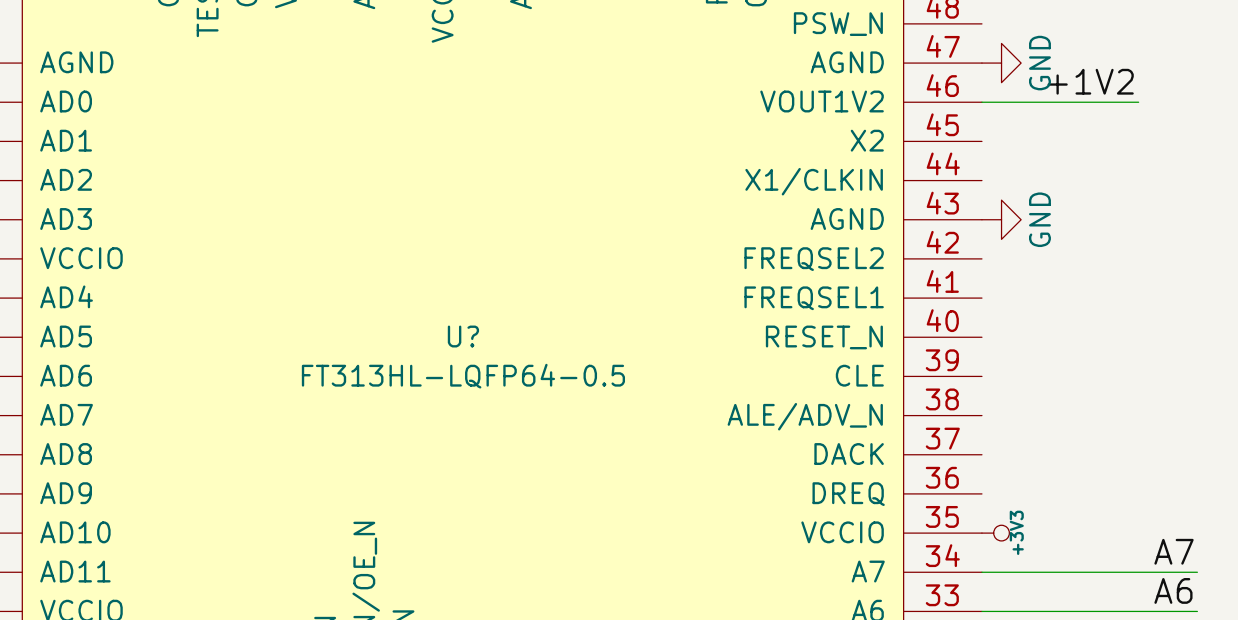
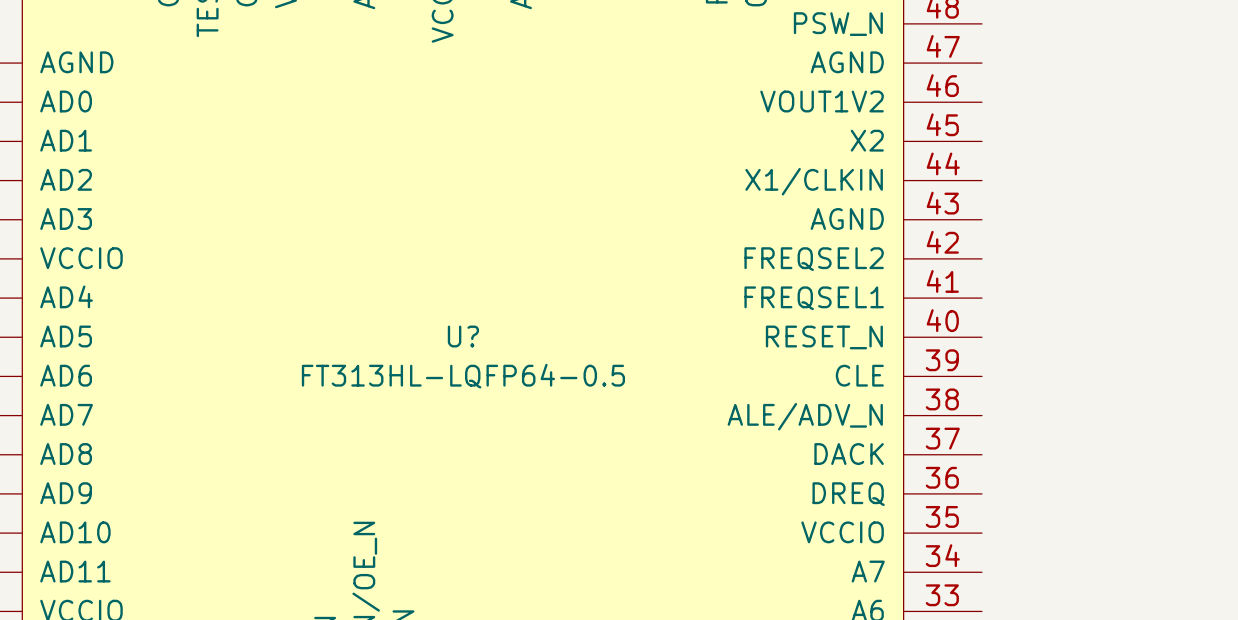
power symbol: GND (1001, 63) -> none
label: +1V2 (1090, 81) -> none
wire: (981, 102) (1138, 102) -> none
power symbol: GND (1001, 219) -> none
power symbol: +3V3 (995, 533) -> none
label: A7 (1174, 551) -> none
wire: (981, 572) (1197, 572) -> none
label: A6 (1173, 590) -> none
wire: (981, 611) (1197, 611) -> none

